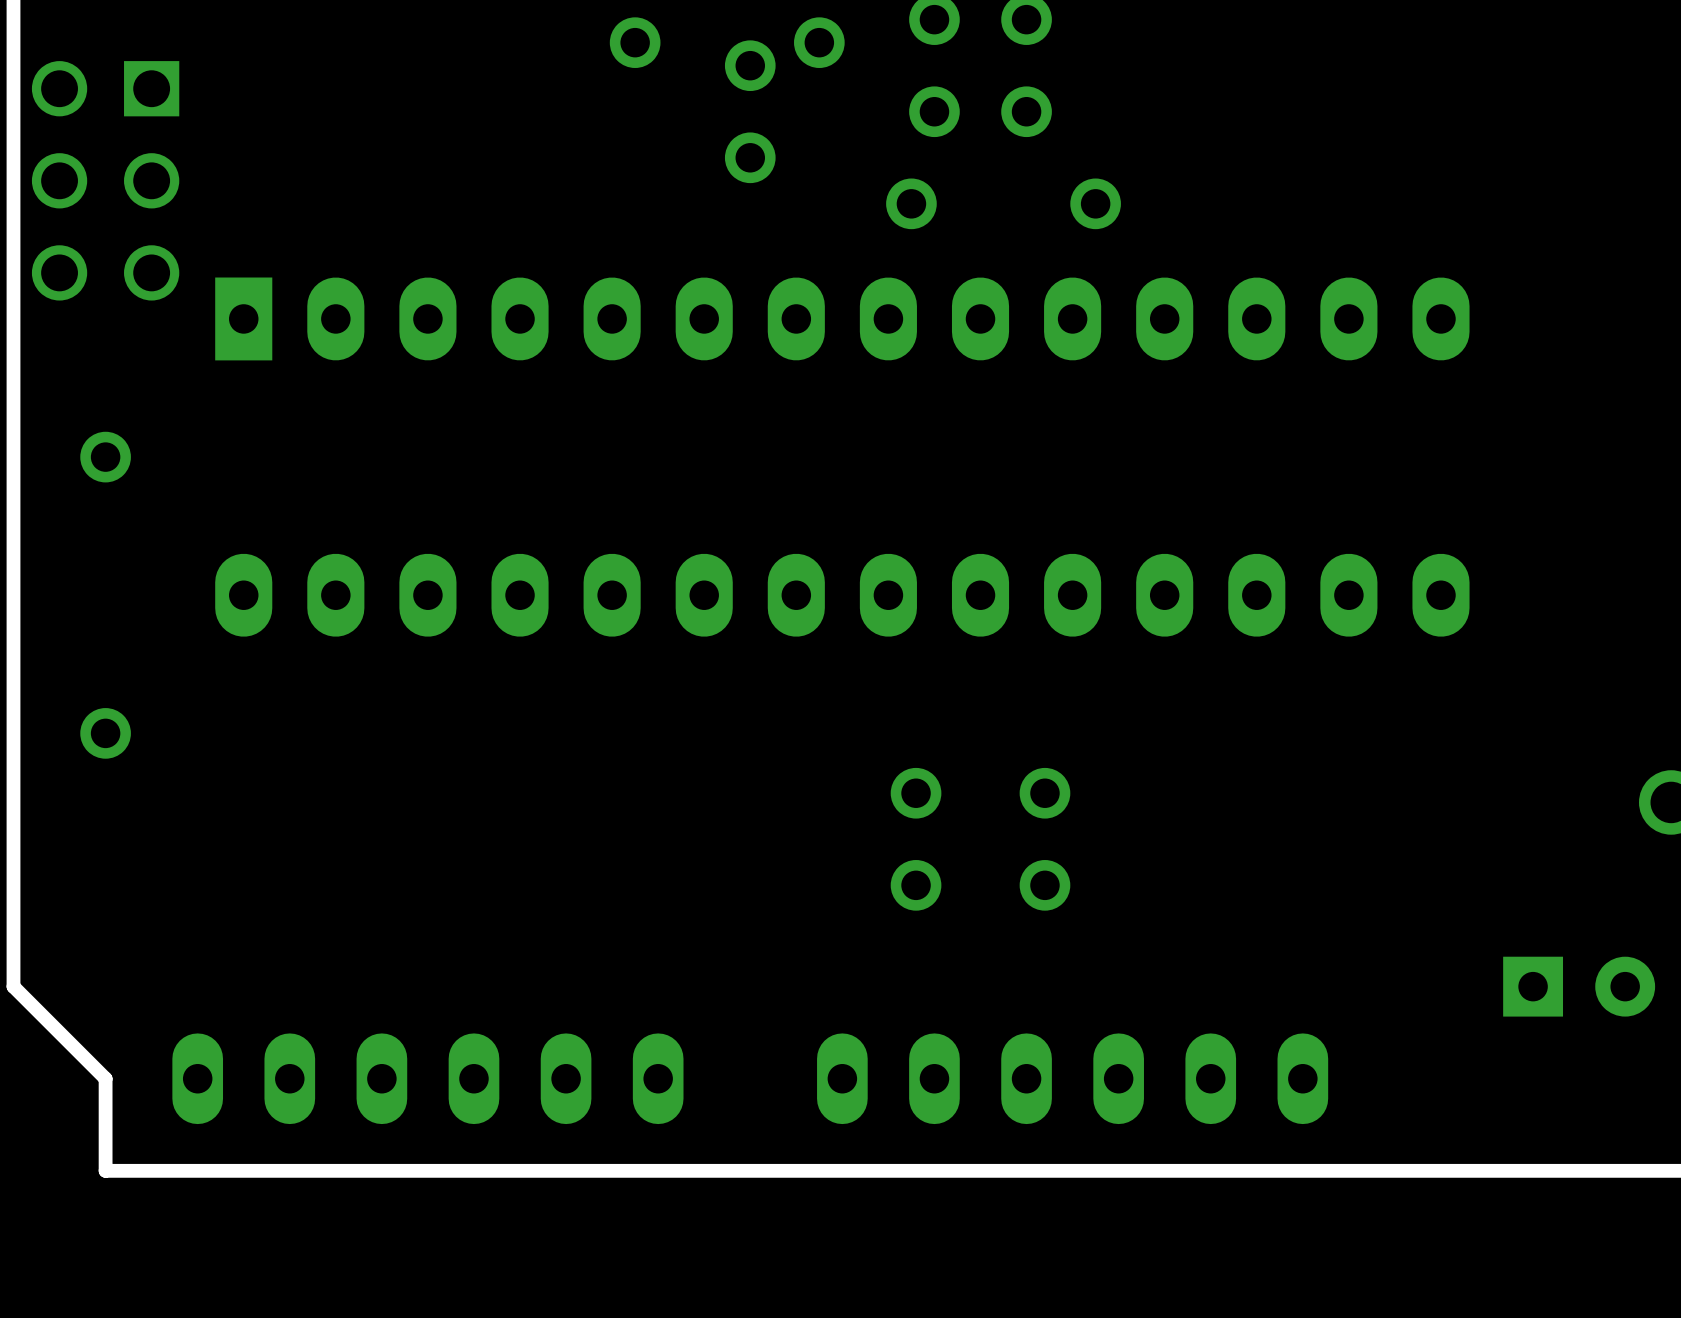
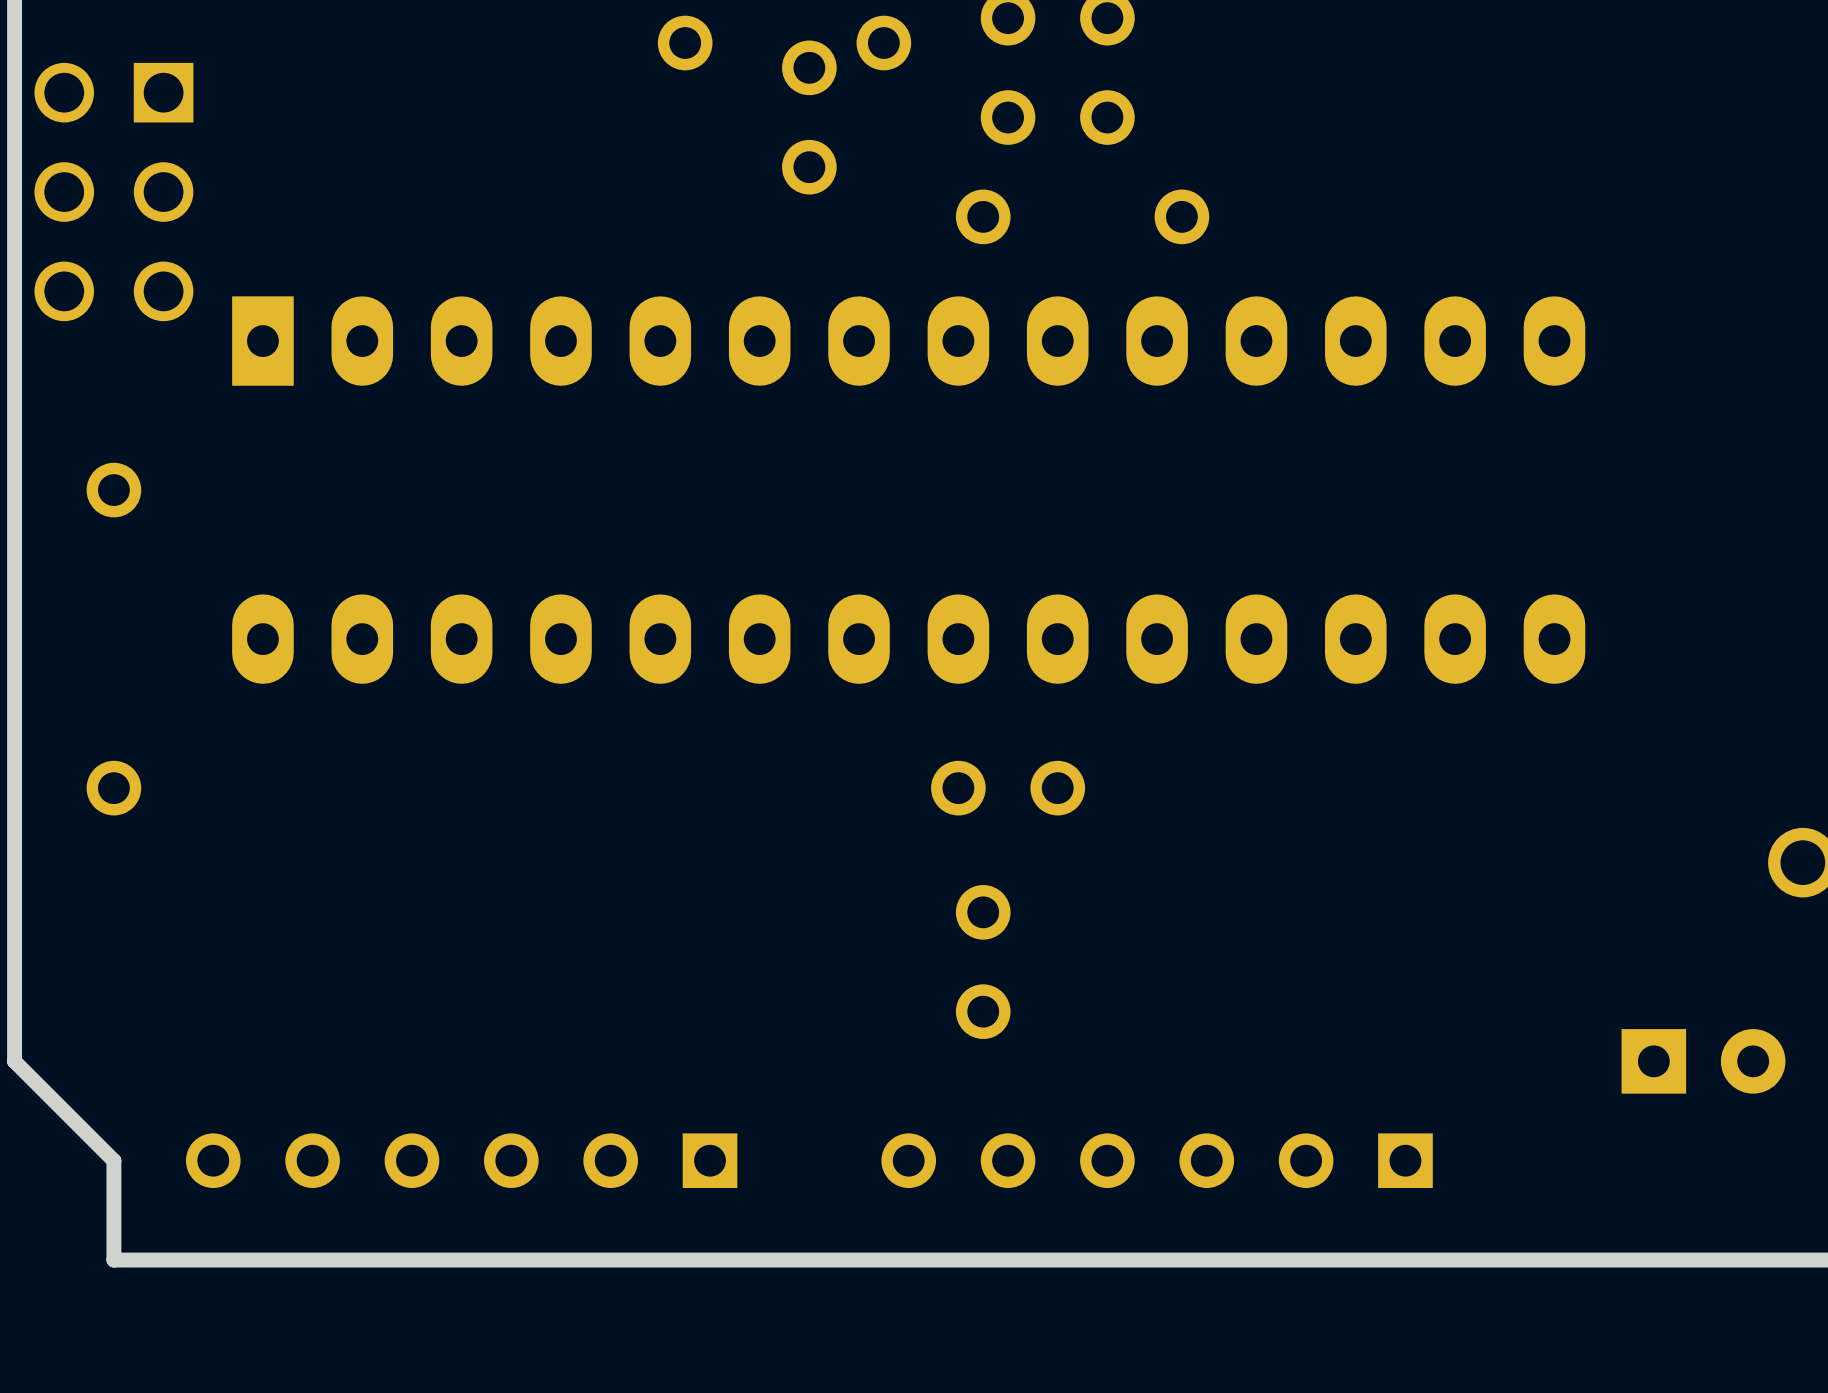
part: none -> (1008, 788)
part: (916, 839) -> none
part: (1044, 839) -> none
part: none -> (983, 962)
part footprint: [172, 1033, 684, 1125] -> [185, 1133, 738, 1189]
part footprint: [817, 1033, 1329, 1125] -> [881, 1133, 1433, 1189]

